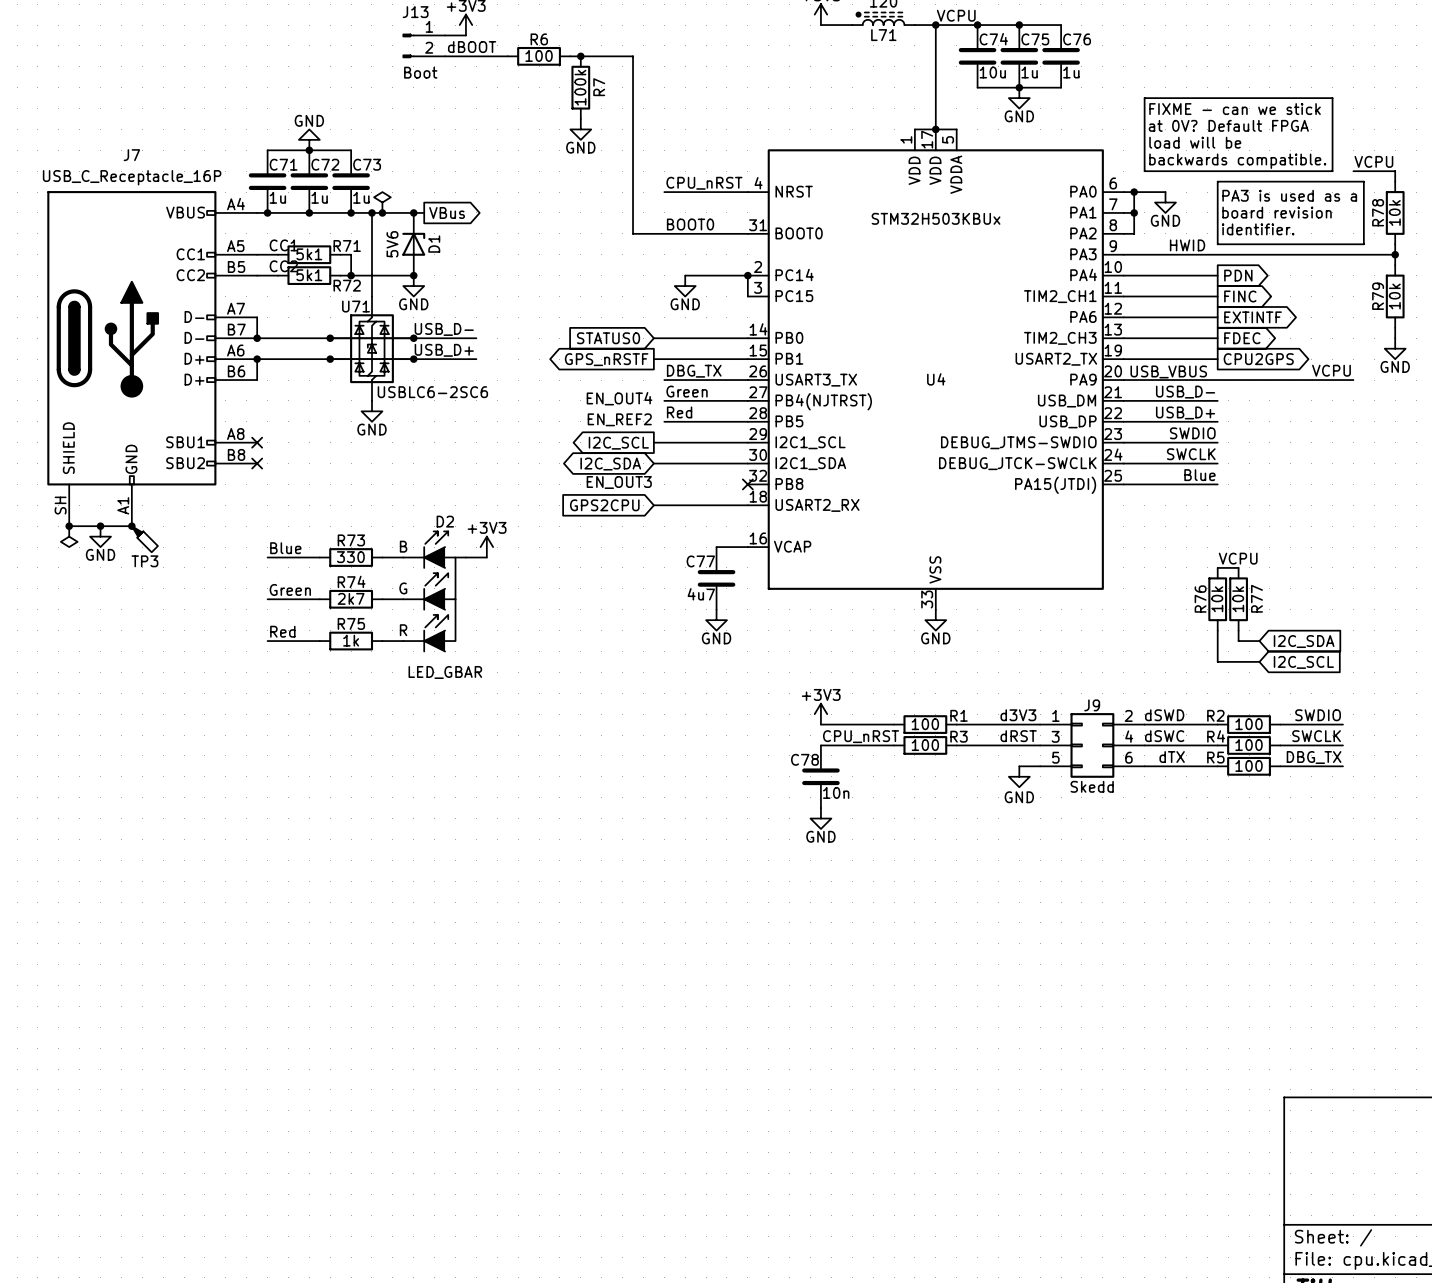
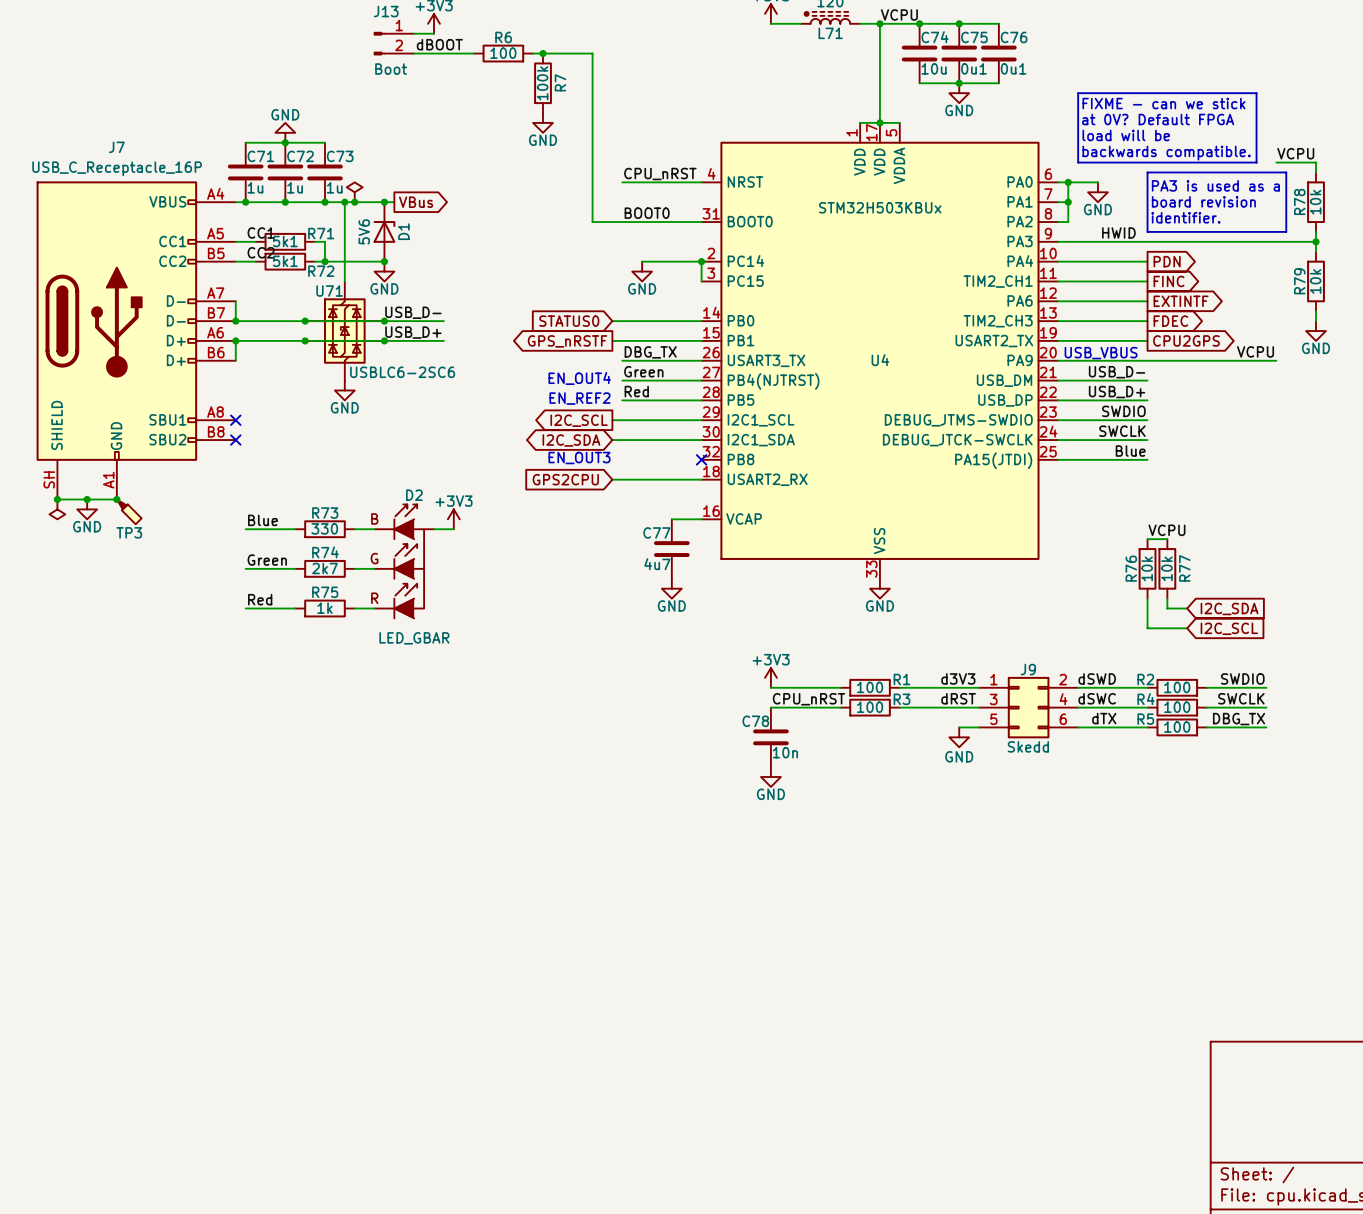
C75 value: 1u (1029, 72) -> 0u1 (973, 68)
C76 value: 1u (1071, 72) -> 0u1 (1013, 68)

